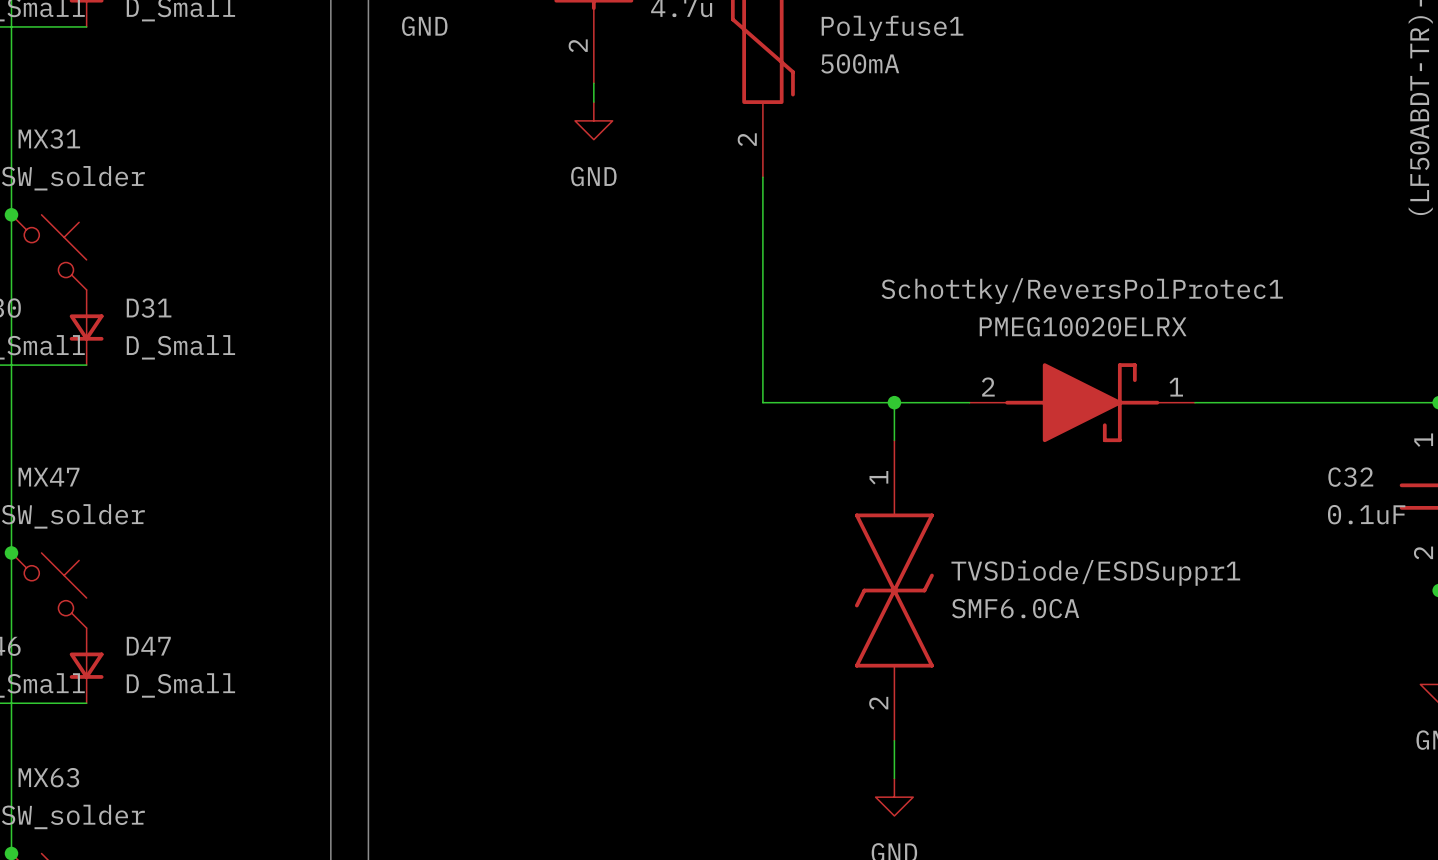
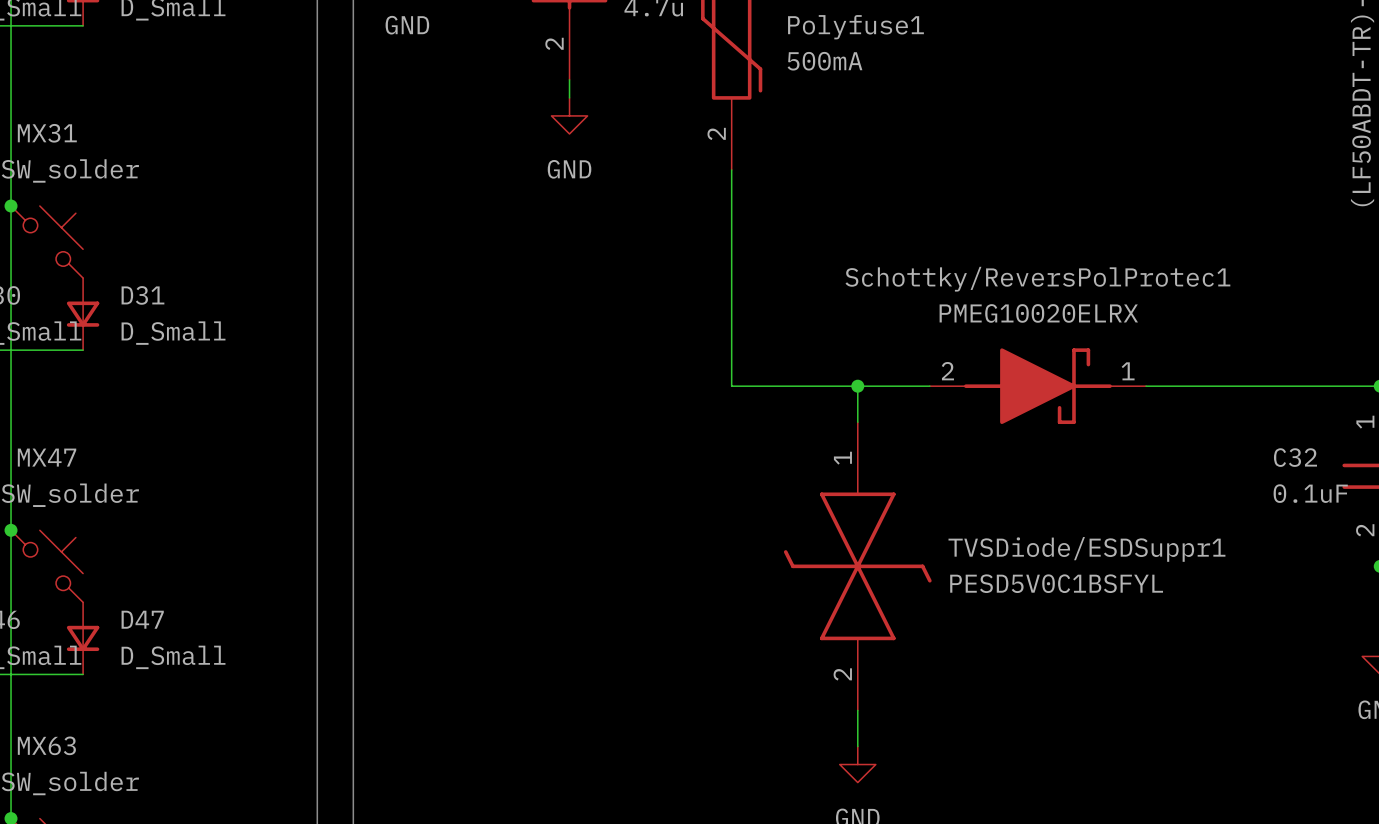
TVSDiode/ESDSuppr1 symbol: [854, 440, 934, 741] -> [783, 422, 932, 711]
TVSDiode/ESDSuppr1 name position: TVSDiode/ESDSuppr1 (1095, 572) -> TVSDiode/ESDSuppr1 (1086, 549)
TVSDiode/ESDSuppr1 value: SMF6.0CA (1015, 608) -> PESD5V0C1BSFYL (1056, 583)

